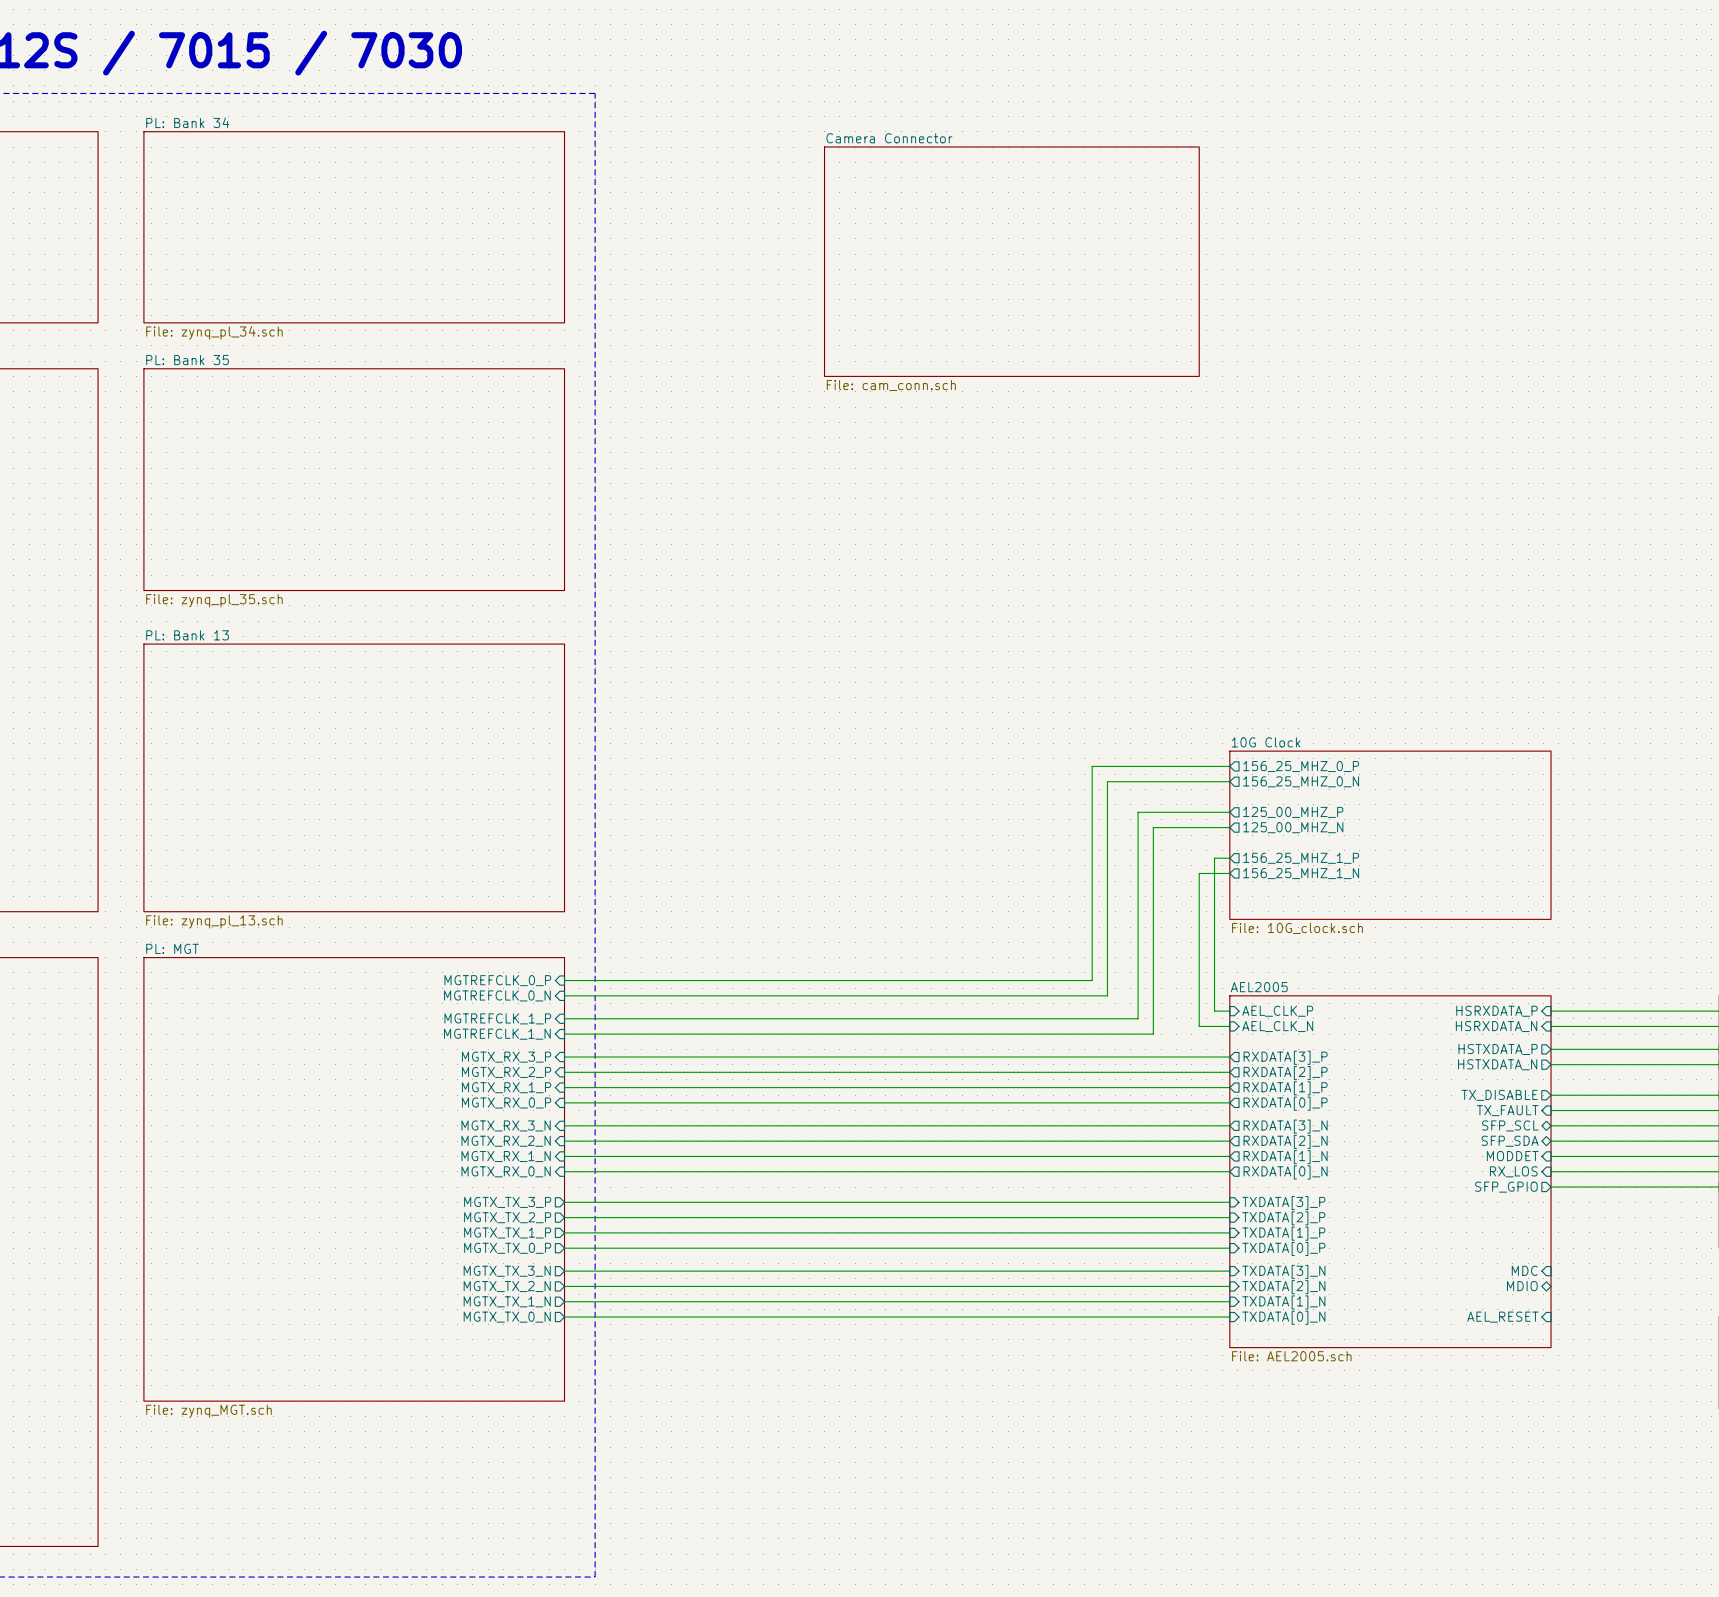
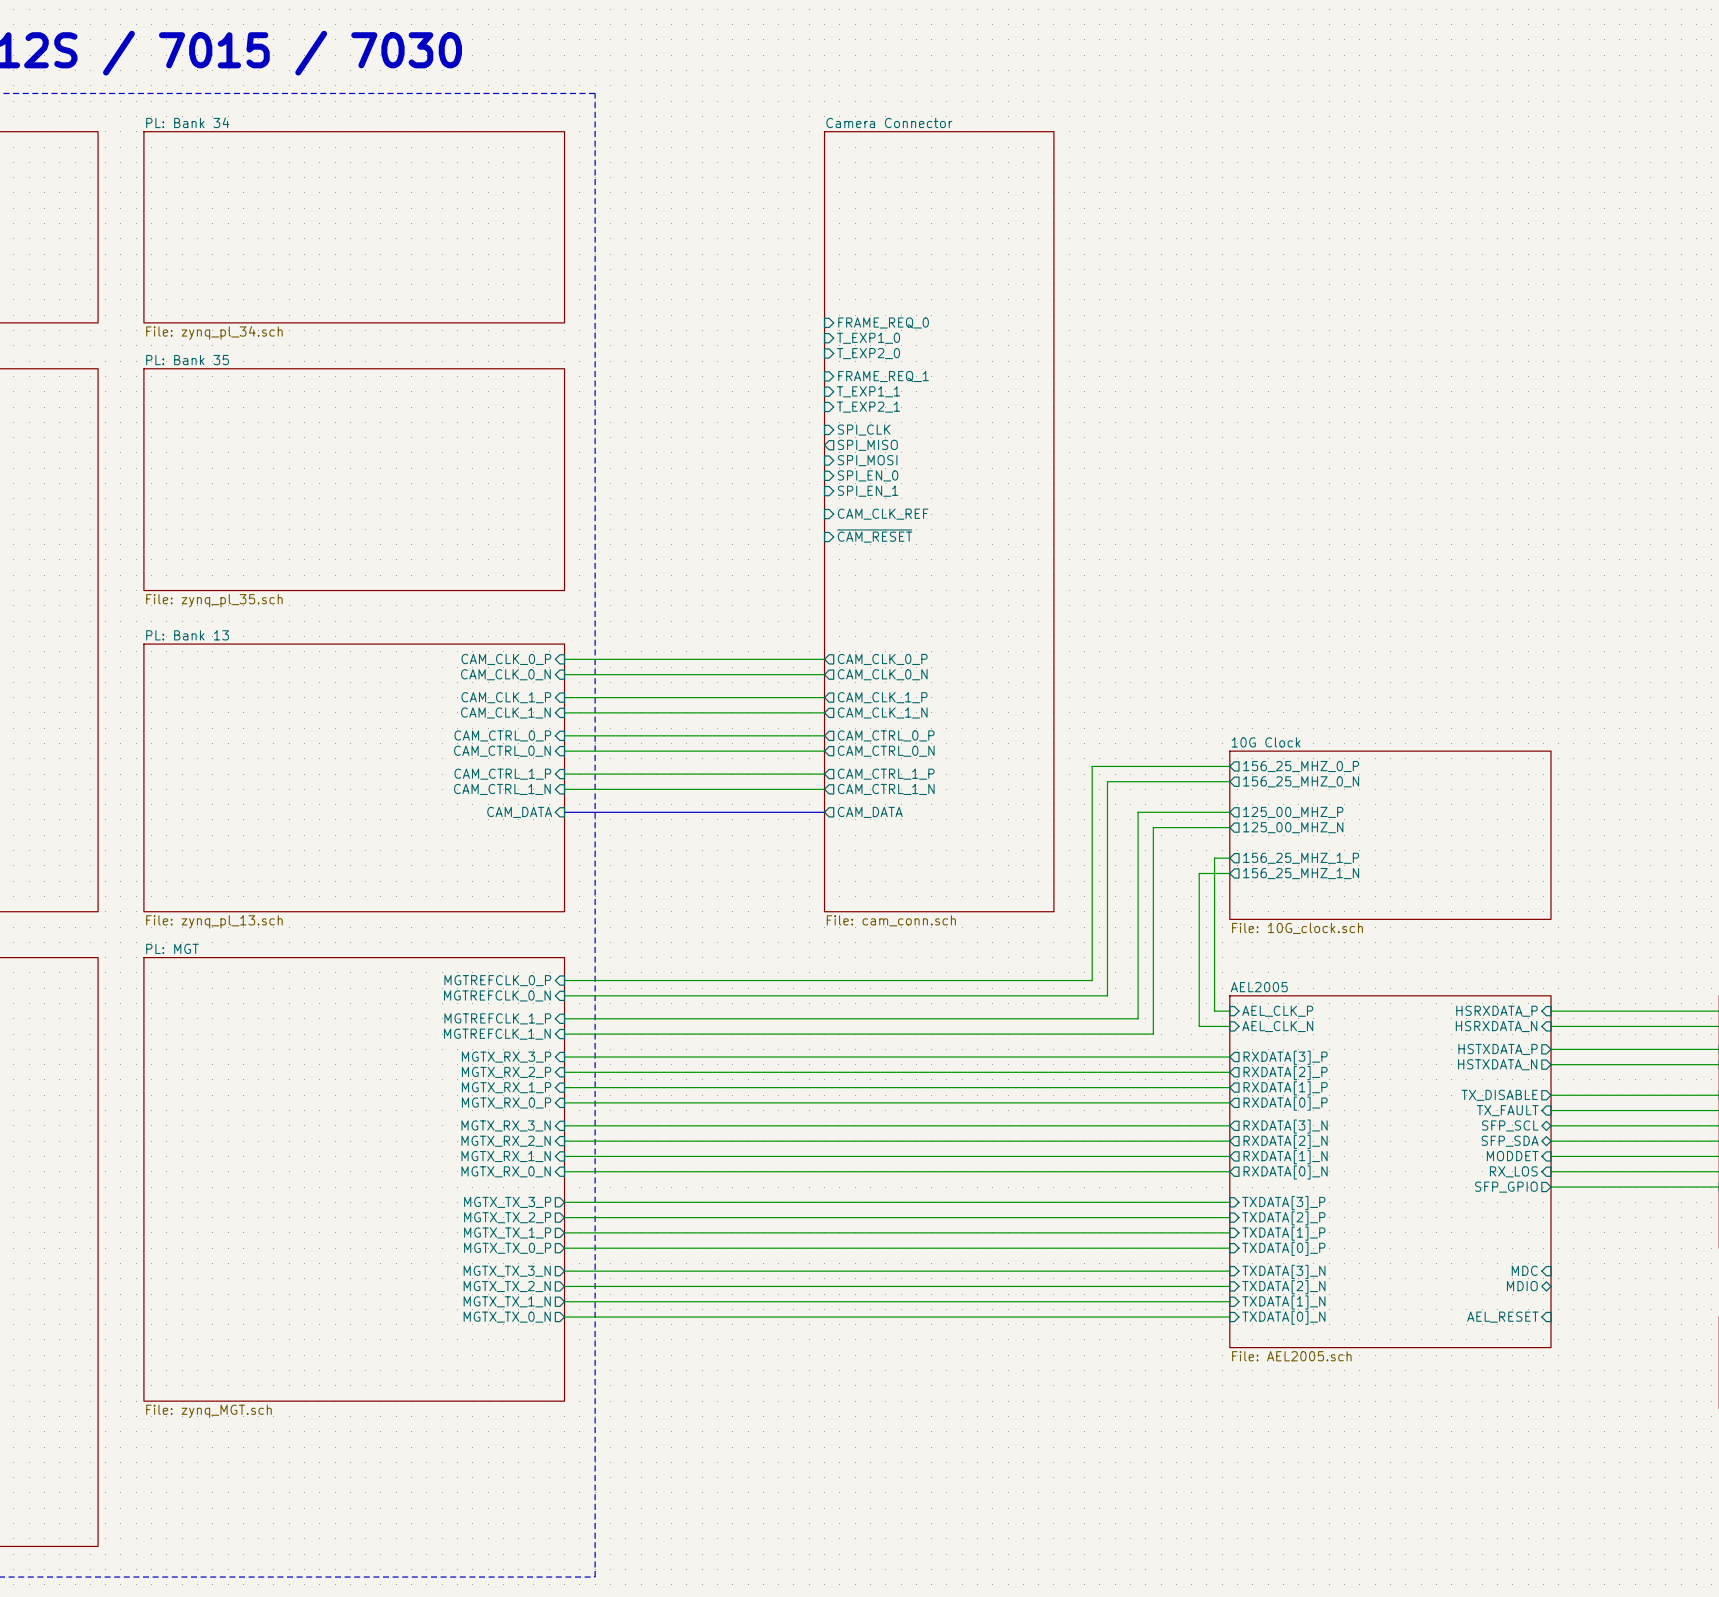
sheet Camera Connector: File: cam_conn.sch (1011, 261) -> none
sheet pin: none -> FRAME_REQ_0 (883, 322)
sheet pin: none -> T_EXP1_0 (868, 338)
sheet pin: none -> T_EXP2_0 (868, 353)
sheet pin: none -> FRAME_REQ_1 (883, 376)
sheet pin: none -> T_EXP1_1 (868, 391)
sheet pin: none -> T_EXP2_1 (868, 407)
sheet pin: none -> SPI_CLK (864, 430)
sheet pin: none -> SPI_MISO (867, 445)
sheet pin: none -> SPI_MOSI (867, 460)
sheet pin: none -> SPI_EN_0 (868, 475)
sheet pin: none -> SPI_EN_1 (868, 491)
sheet pin: none -> CAM_CLK_REF (883, 514)
sheet Camera Connector: none -> File: cam_conn.sch (939, 521)
sheet pin: none -> ~{CAM_RESET} (874, 536)
sheet pin: none -> CAM_CLK_0_P (506, 659)
wire: none -> (564, 659) (824, 659)
sheet pin: none -> CAM_CLK_0_P (882, 659)
sheet pin: none -> CAM_CLK_0_N (505, 674)
wire: none -> (564, 674) (824, 674)
sheet pin: none -> CAM_CLK_0_N (882, 674)
sheet pin: none -> CAM_CLK_1_P (506, 697)
wire: none -> (564, 697) (824, 697)
sheet pin: none -> CAM_CLK_1_P (882, 697)
sheet pin: none -> CAM_CLK_1_N (505, 712)
wire: none -> (564, 712) (824, 712)
sheet pin: none -> CAM_CLK_1_N (882, 712)
sheet pin: none -> CAM_CTRL_0_P (502, 735)
wire: none -> (564, 735) (824, 735)
sheet pin: none -> CAM_CTRL_0_P (886, 735)
sheet pin: none -> CAM_CTRL_0_N (502, 751)
wire: none -> (564, 751) (824, 751)
sheet pin: none -> CAM_CTRL_0_N (886, 751)
sheet pin: none -> CAM_CTRL_1_P (502, 774)
wire: none -> (564, 774) (824, 774)
sheet pin: none -> CAM_CTRL_1_P (886, 774)
sheet pin: none -> CAM_CTRL_1_N (502, 789)
wire: none -> (564, 789) (824, 789)
sheet pin: none -> CAM_CTRL_1_N (886, 789)
sheet pin: none -> CAM_DATA (519, 812)
bus: none -> (564, 812) (824, 812)
sheet pin: none -> CAM_DATA (870, 812)

